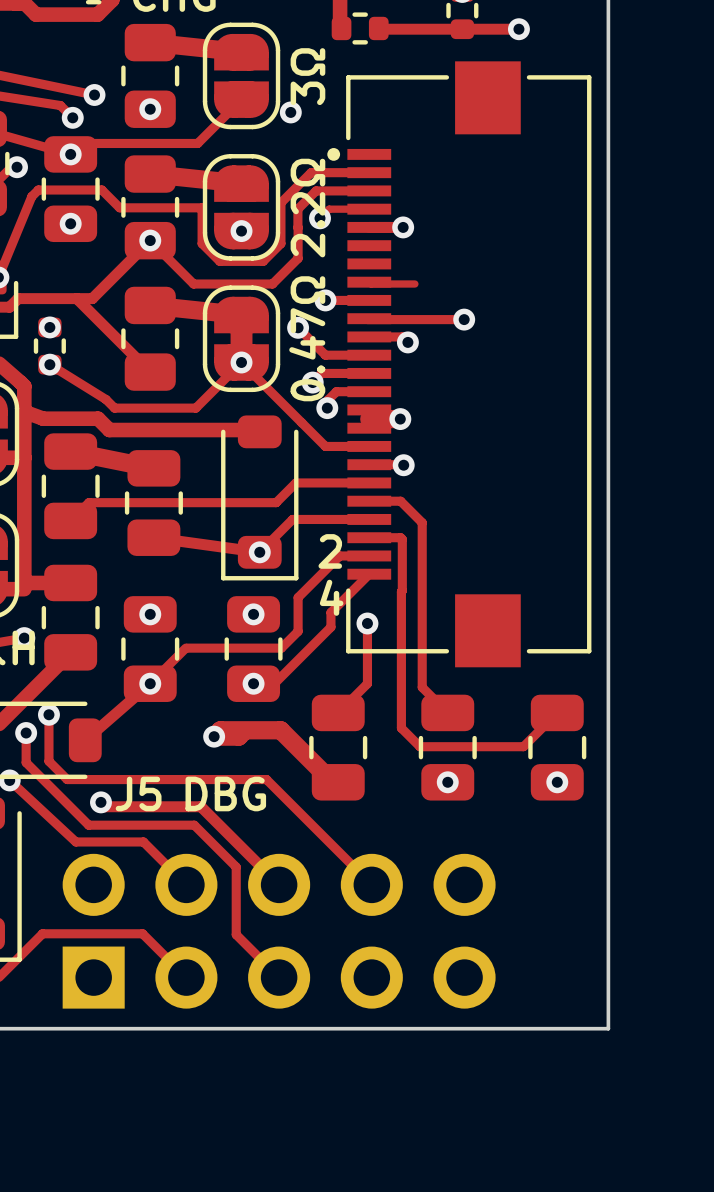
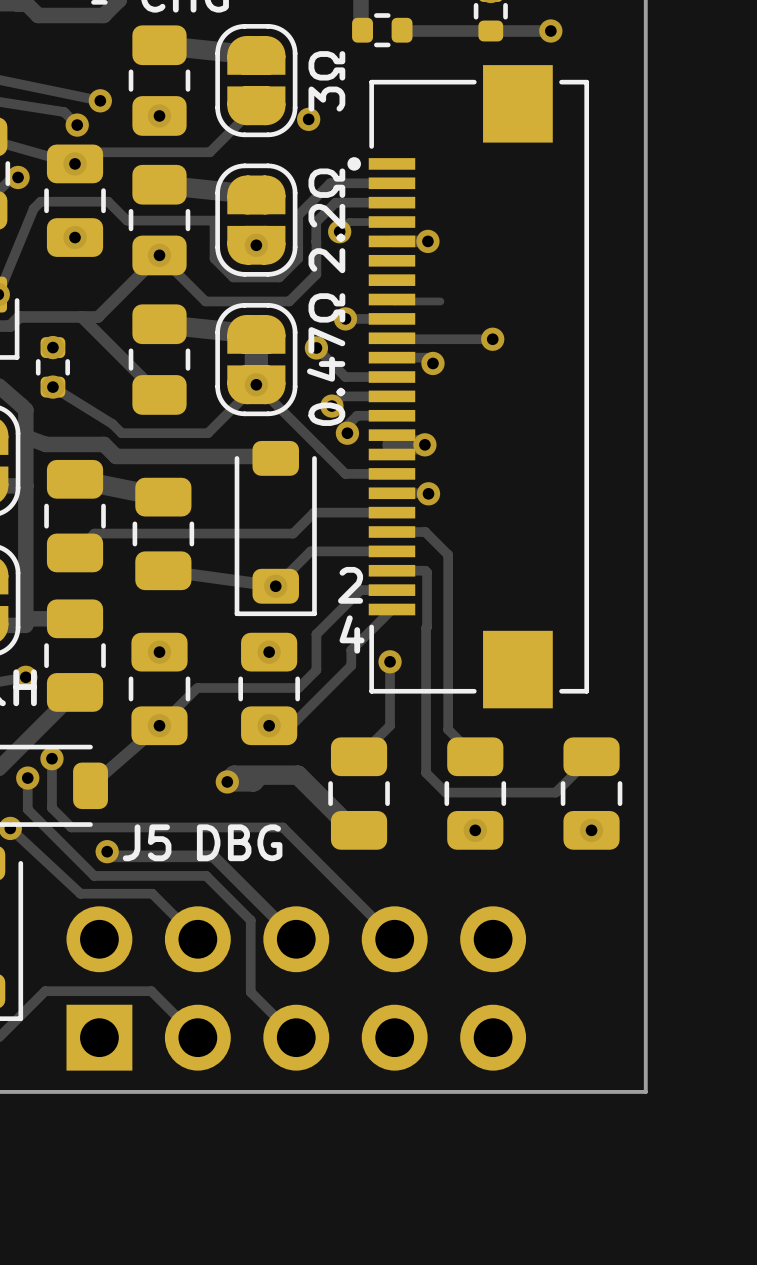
part footprint: [327, 61, 592, 668] -> [347, 65, 590, 709]

